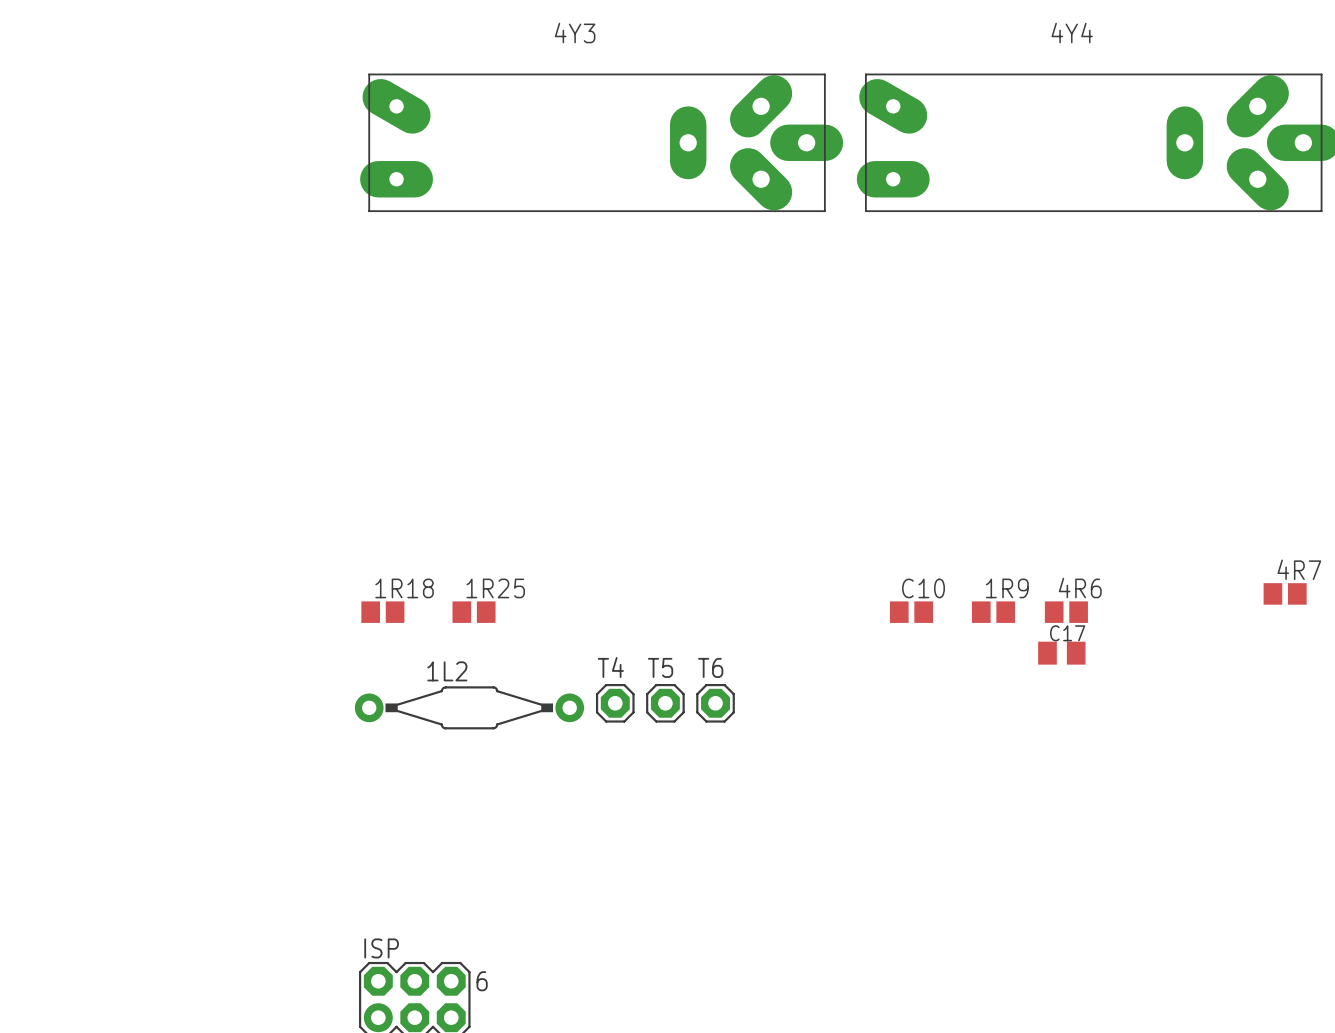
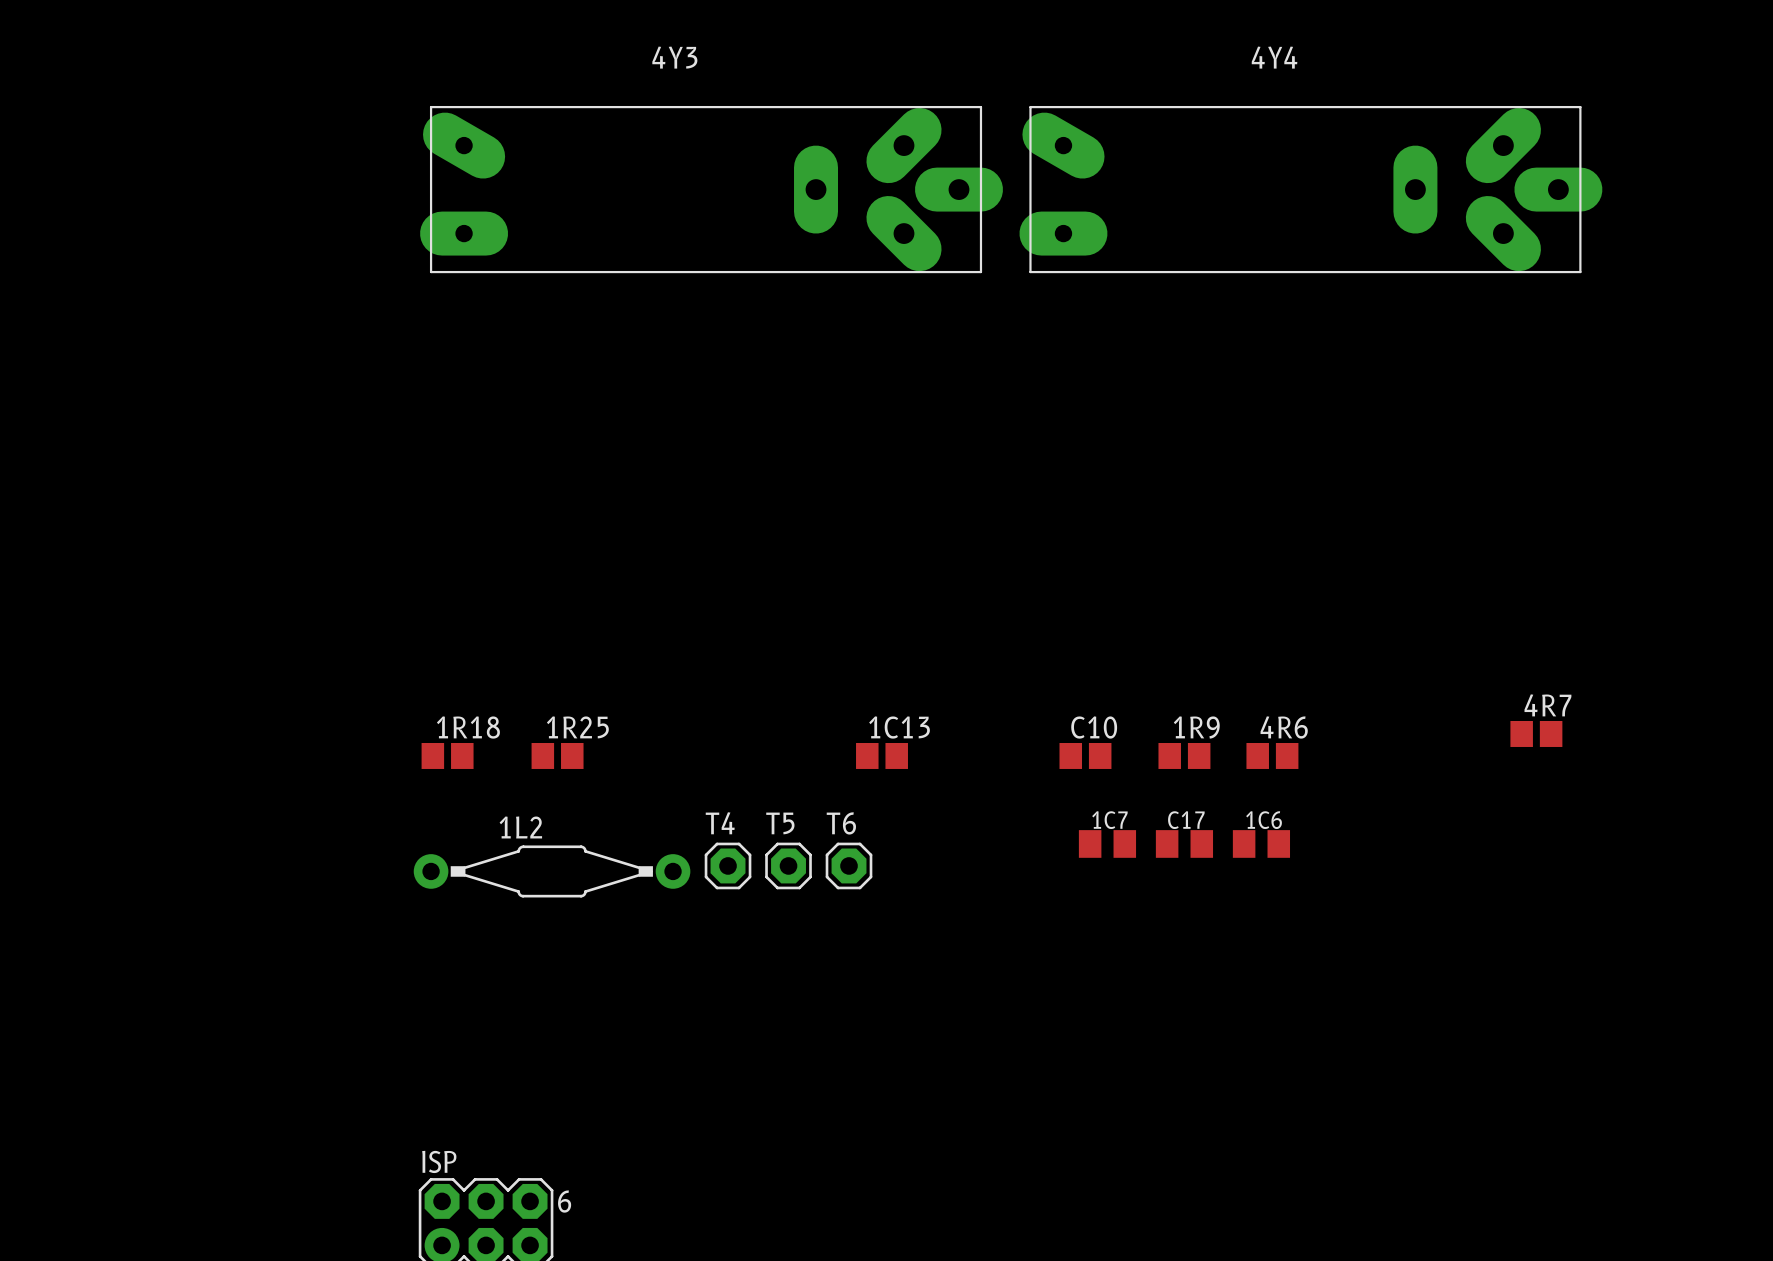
1C13: none -> (882, 755)
C17 position: (1061, 653) -> (1184, 843)
1C7: none -> (1107, 843)
1C6: none -> (1261, 843)

